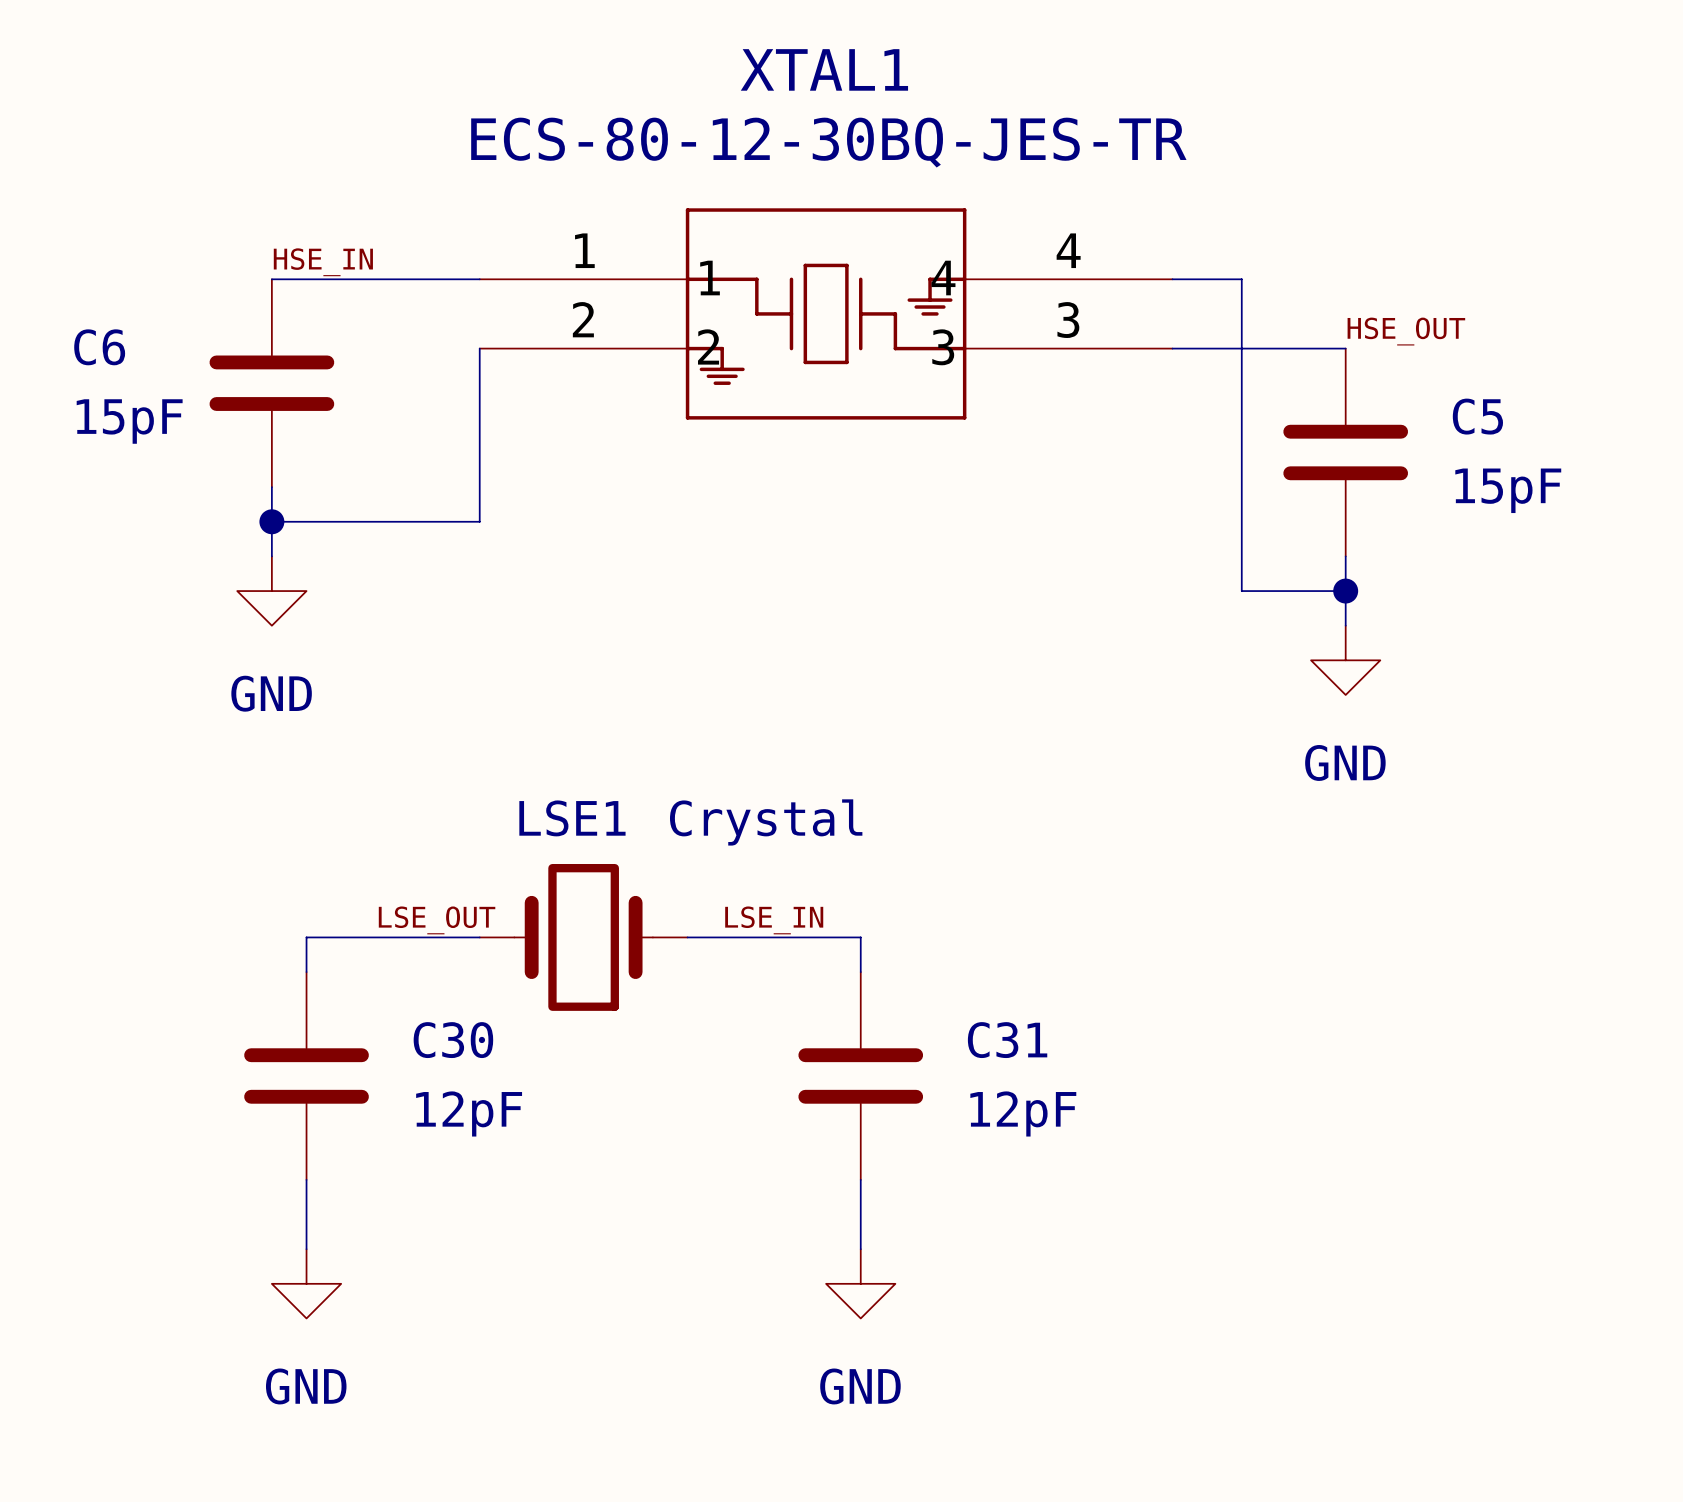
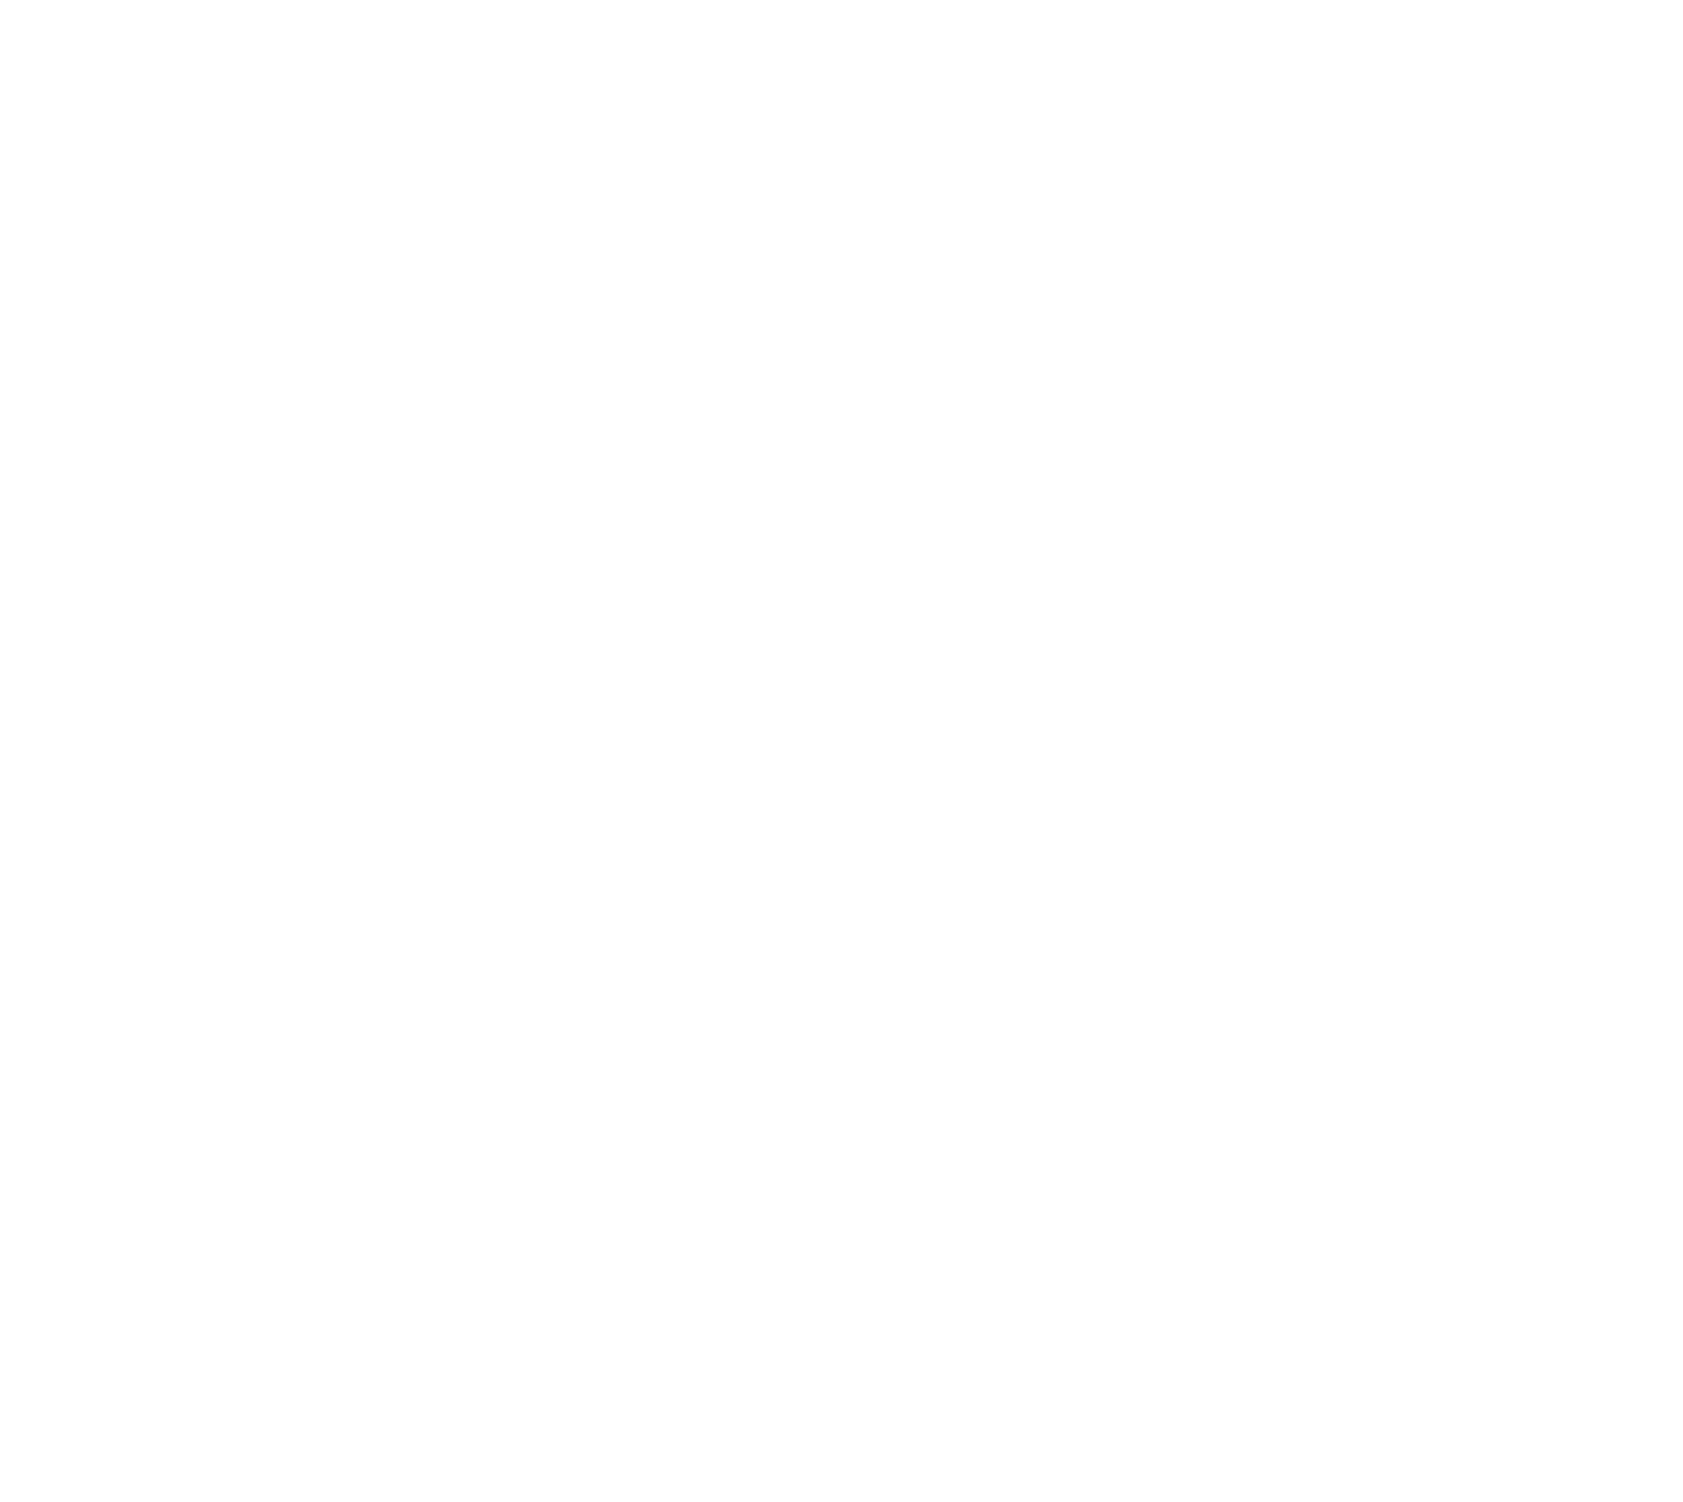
label: HSE_IN (323, 262) -> none
wire: (271, 279) (479, 279) -> none
wire: (1172, 279) (1241, 279) (1241, 591) (1345, 591) -> none
XTAL1: ECS-80-12-30BQ-JES-TR (826, 313) -> none
label: HSE_OUT (1406, 331) -> none
wire: (479, 348) (479, 521) (271, 521) -> none
wire: (1172, 348) (1345, 348) -> none
C6: 15pF (271, 383) -> none
C5: 15pF (1345, 452) -> none
wire: (271, 487) (271, 556) -> none
junction: (271, 521) -> none
wire: (1345, 556) (1345, 625) -> none
power symbol: GND (271, 591) -> none
junction: (1345, 591) -> none
power symbol: GND (1345, 660) -> none
label: LSE_OUT (437, 920) -> none
label: LSE_IN (774, 920) -> none
wire: (479, 937) (306, 937) (306, 972) -> none
LSE1: Crystal (583, 937) -> none
wire: (687, 937) (860, 937) (860, 972) -> none
C30: 12pF (306, 1075) -> none
C31: 12pF (860, 1075) -> none
wire: (306, 1179) (306, 1249) -> none
wire: (860, 1179) (860, 1249) -> none
power symbol: GND (306, 1283) -> none
power symbol: GND (860, 1283) -> none

